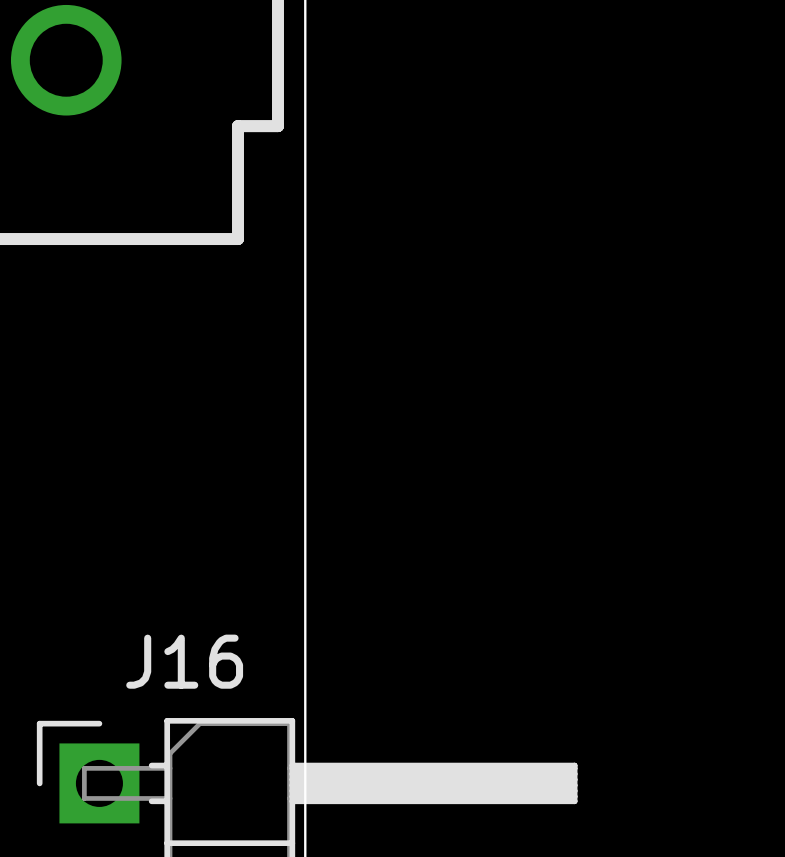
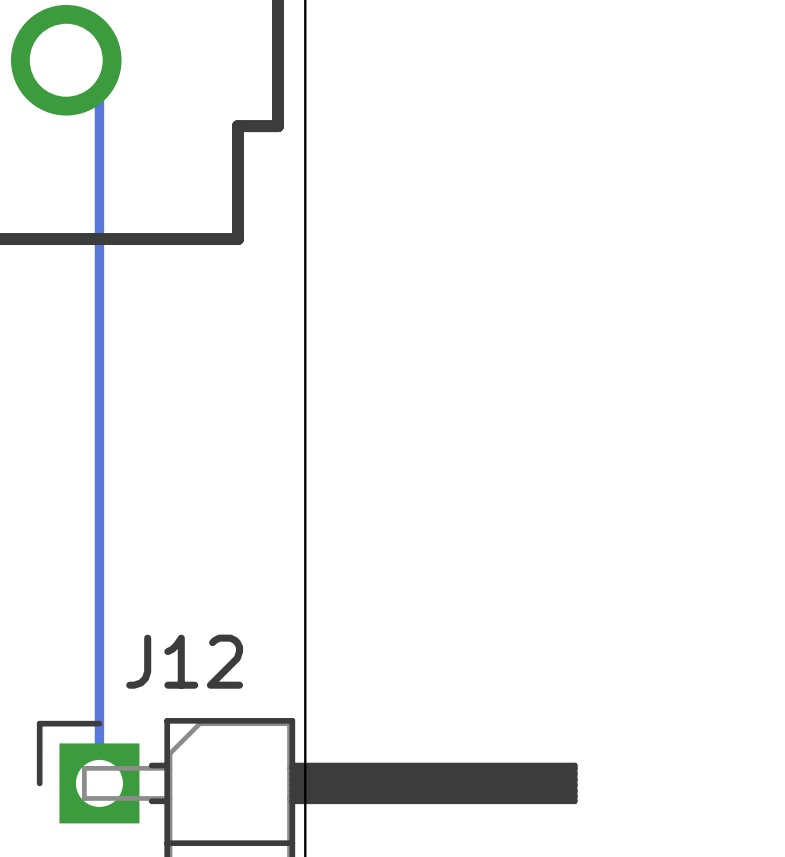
bottom track: none -> (66, 60) (99, 93) (99, 783)
J16 name: J16 (184, 661) -> J12 (184, 661)

